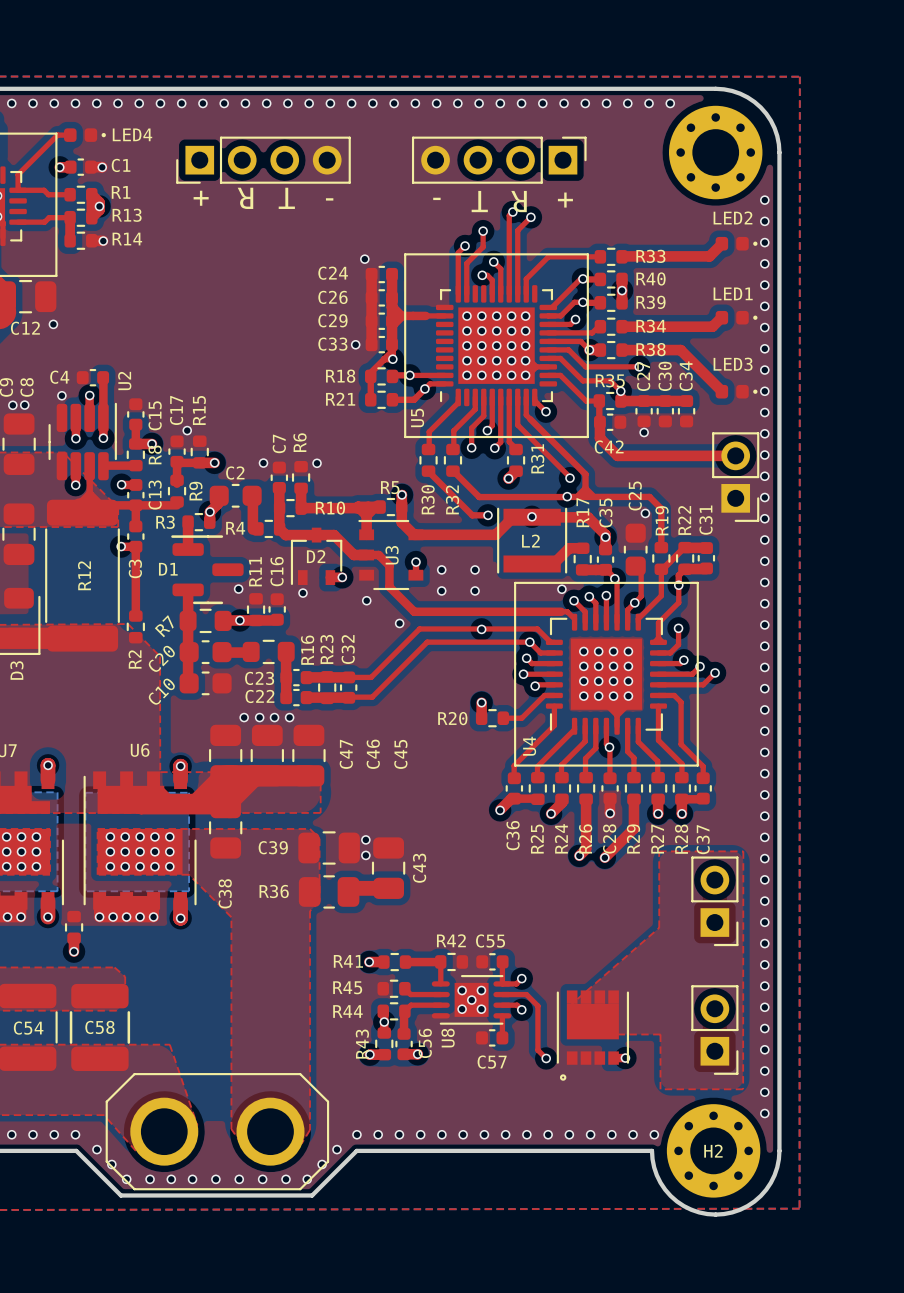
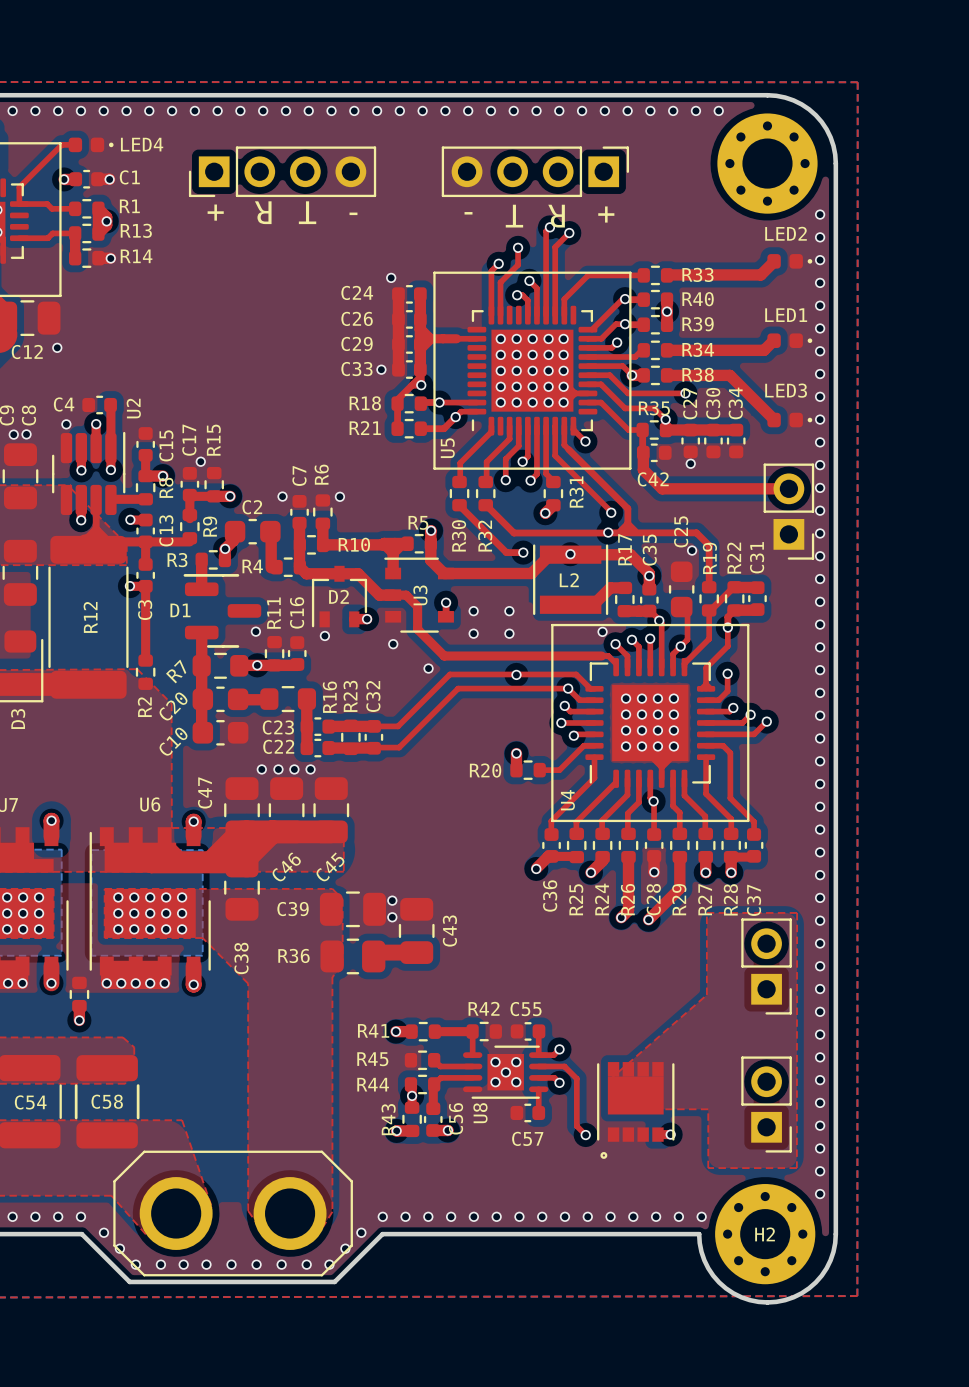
C47 name position: C47 (346, 754) -> C47 (205, 792)
C46 name rotation: 0° (373, 754) -> 45° clockwise (286, 867)
C46 name position: C46 (373, 754) -> C46 (286, 867)
C45 name rotation: 0° (400, 754) -> 45° clockwise (330, 867)
C45 name position: C45 (400, 754) -> C45 (330, 867)

